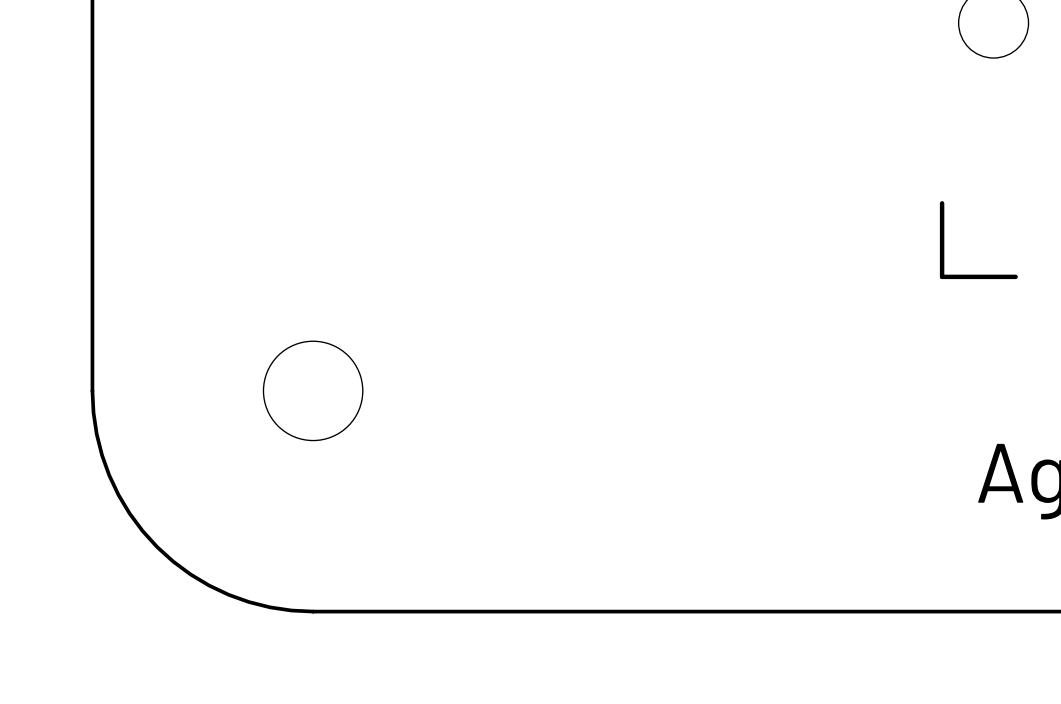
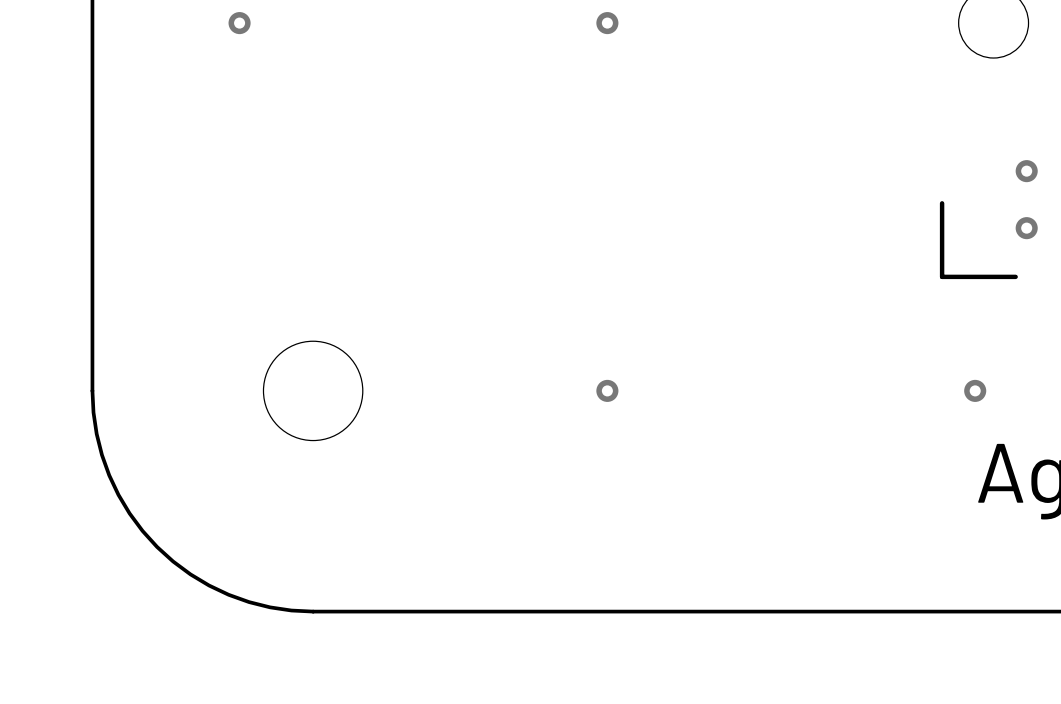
via: none -> (239, 23)
via: none -> (607, 23)
via: none -> (1026, 171)
via: none -> (1026, 228)
via: none -> (607, 390)
via: none -> (975, 390)

